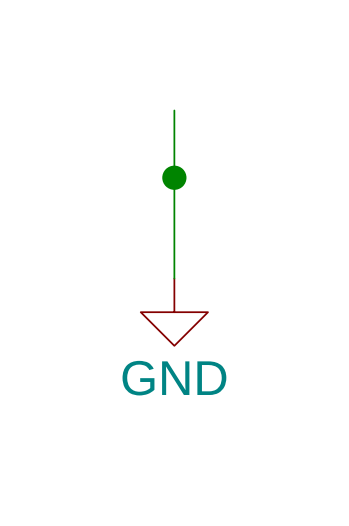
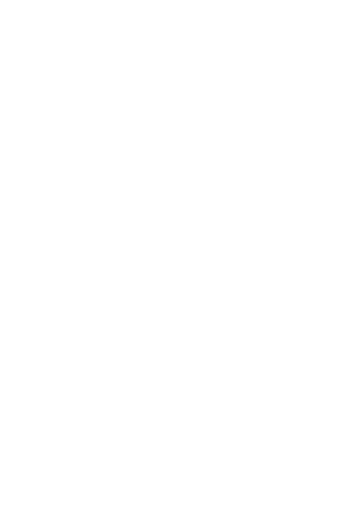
wire: (174, 110) (174, 278) -> none
junction: (174, 177) -> none
power symbol: GND (174, 312) -> none

